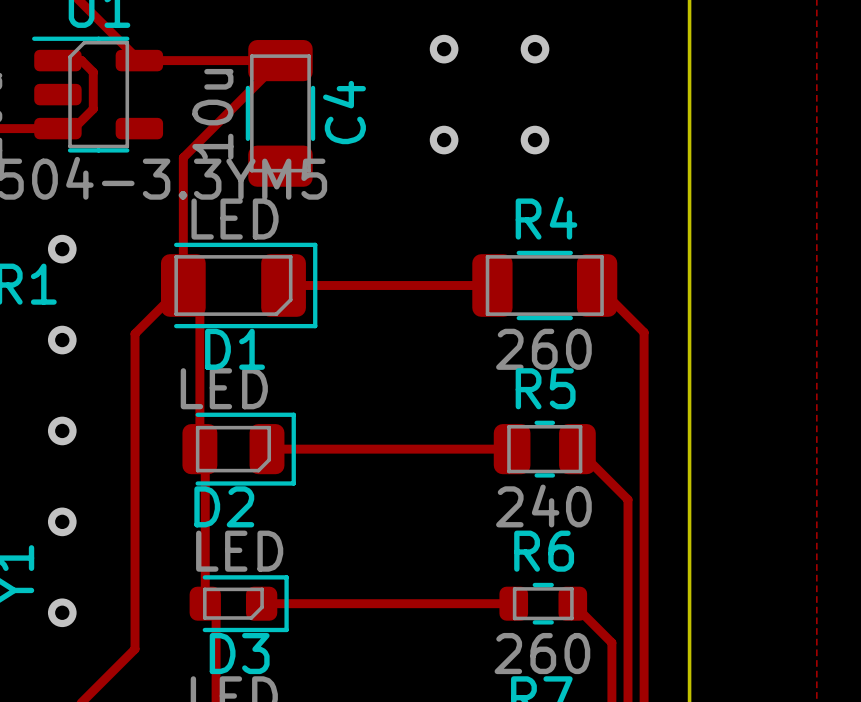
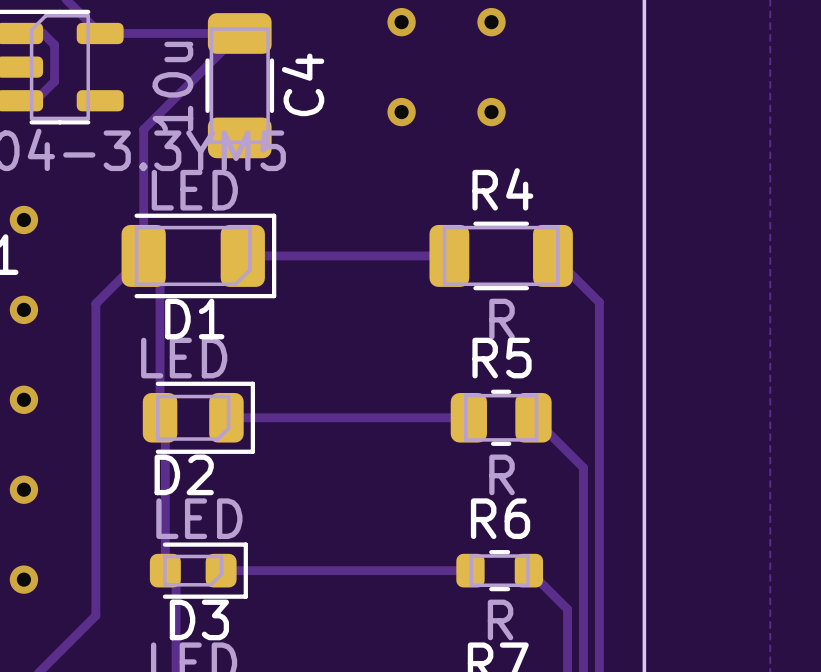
R4 value: 260 (543, 349) -> R (502, 319)
R5 value: 240 (543, 506) -> R (502, 474)
R6 value: 260 (542, 653) -> R (500, 619)

